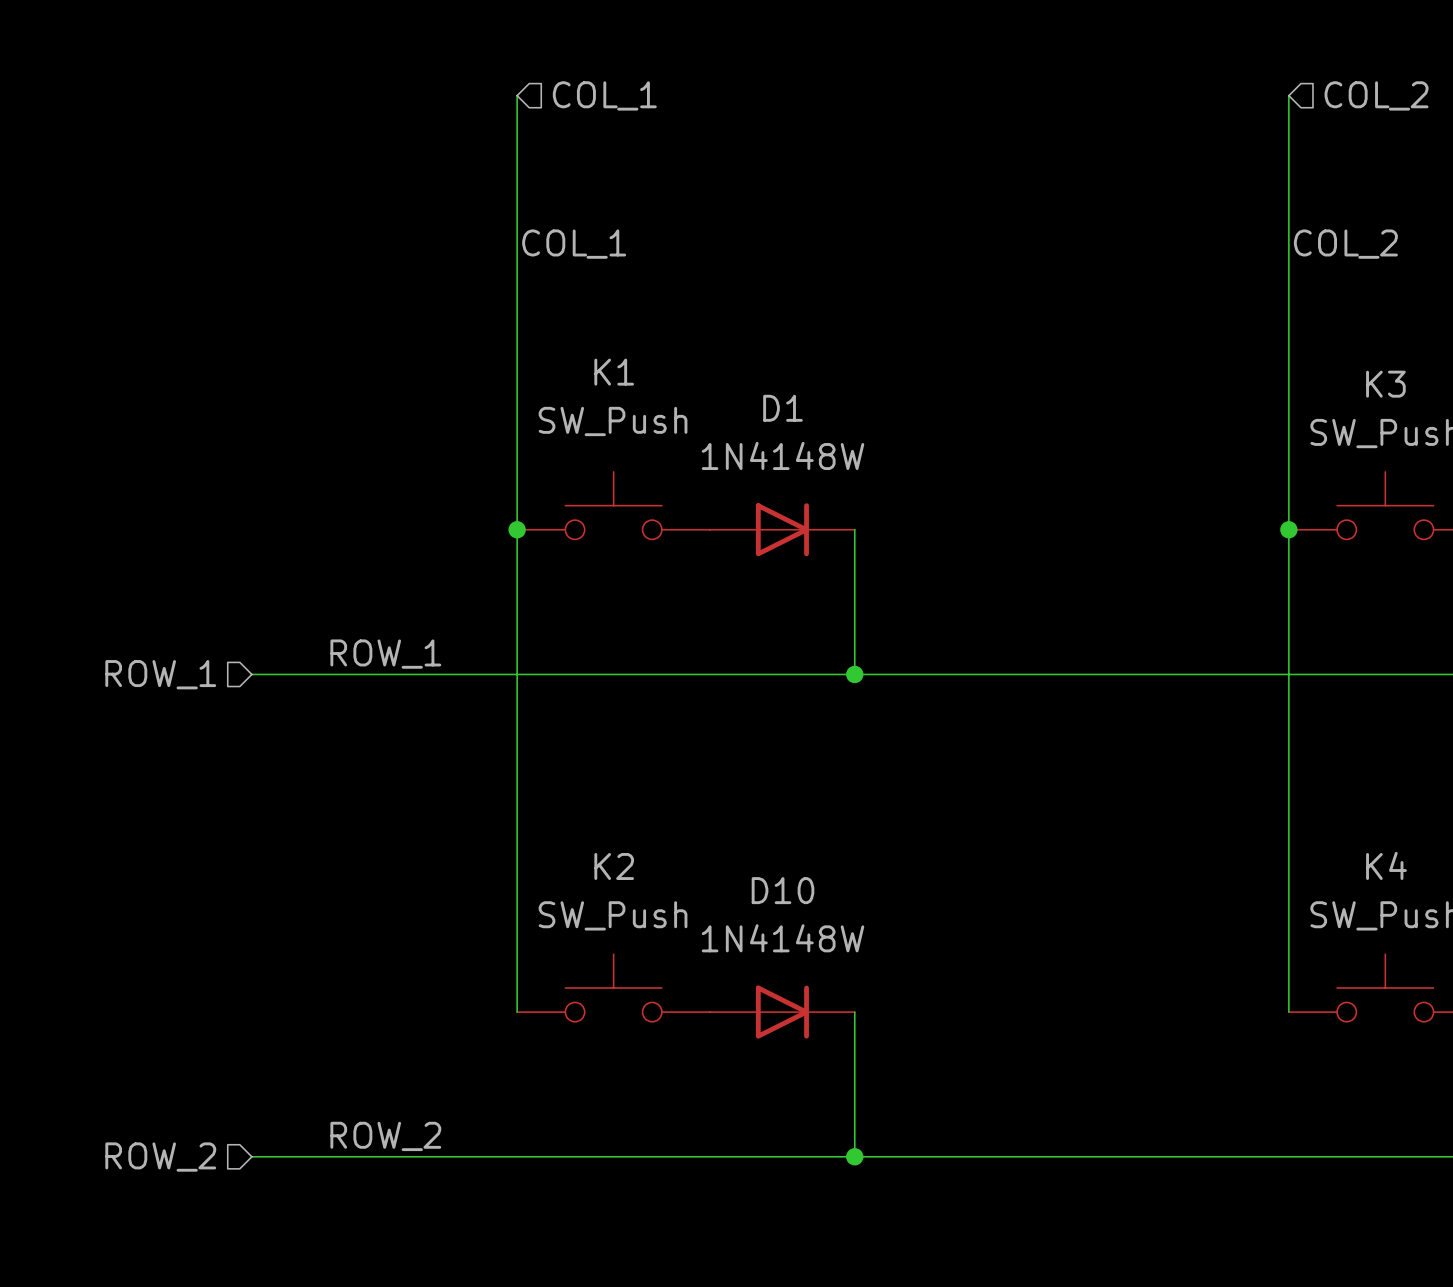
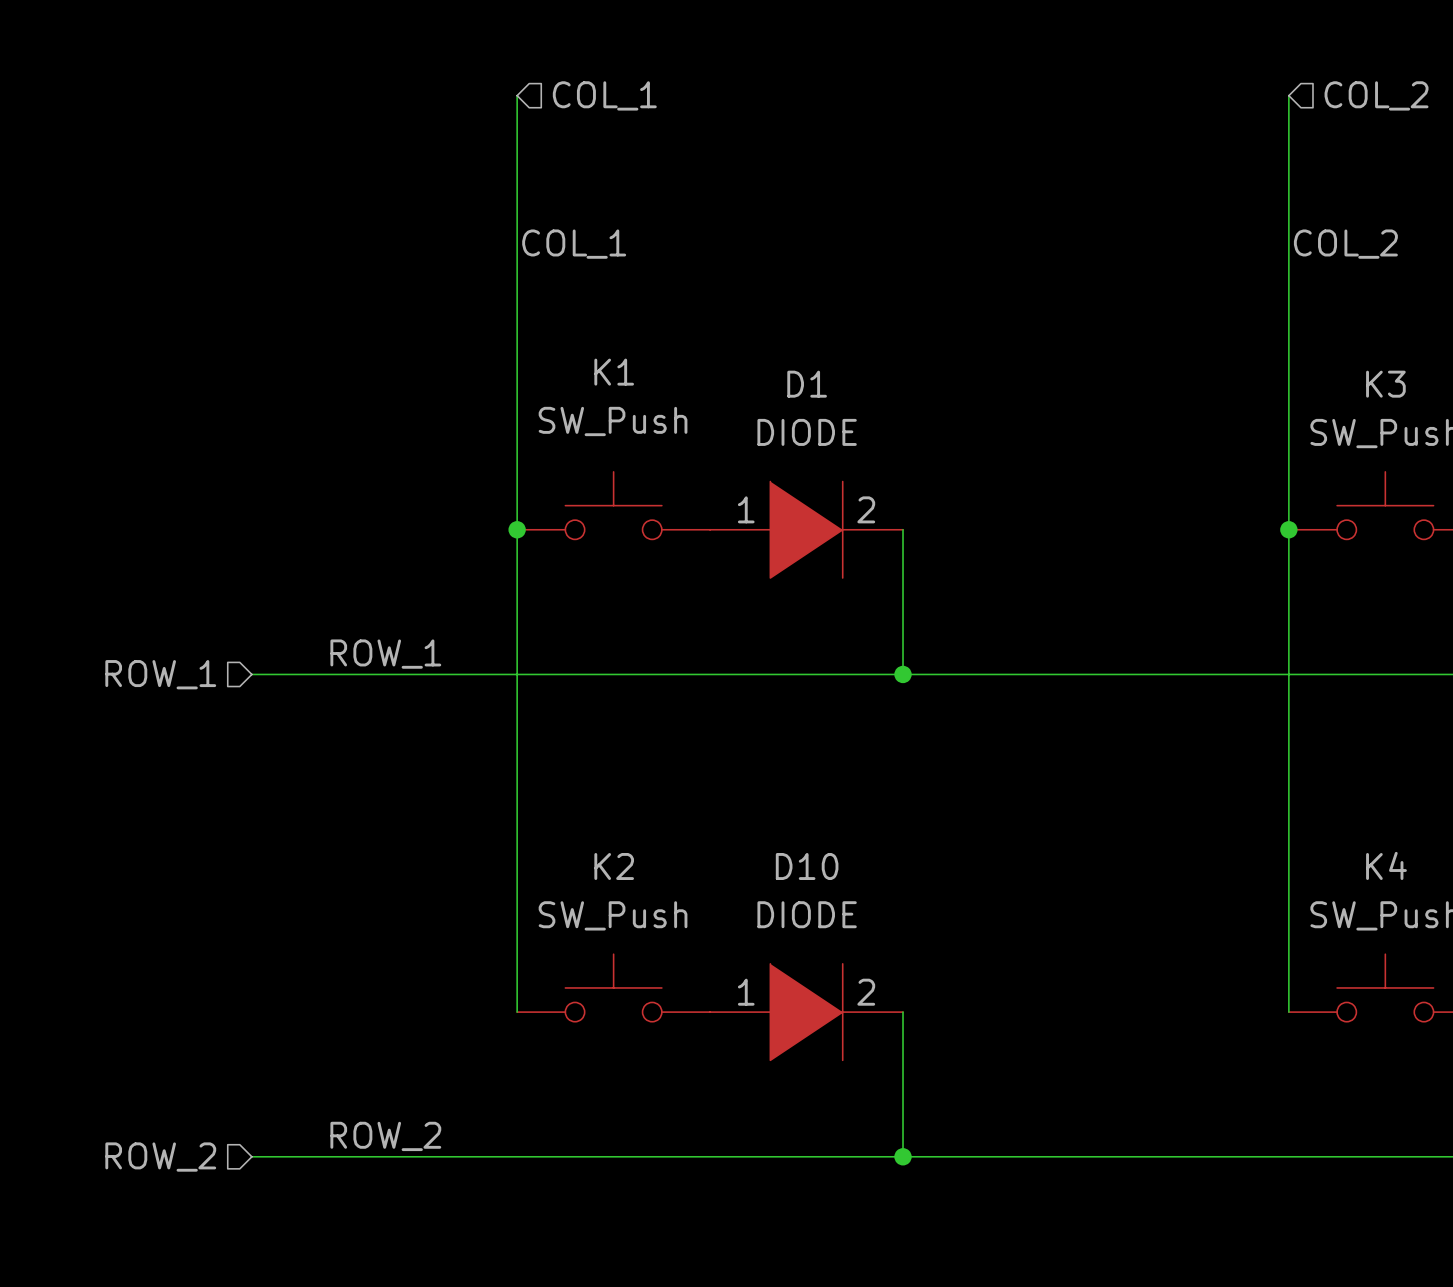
D1 value: 1N4148W (783, 455) -> DIODE (807, 432)
D1 symbol: [710, 503, 855, 557] -> [710, 481, 904, 579]
wire: (854, 529) (854, 674) -> (903, 529) (903, 674)
junction position: (854, 674) -> (903, 674)
D10 value: 1N4148W (783, 938) -> DIODE (807, 914)
D10 symbol: [710, 985, 855, 1039] -> [710, 963, 904, 1061]
wire: (854, 1012) (854, 1156) -> (903, 1012) (903, 1156)
junction position: (854, 1156) -> (903, 1156)

